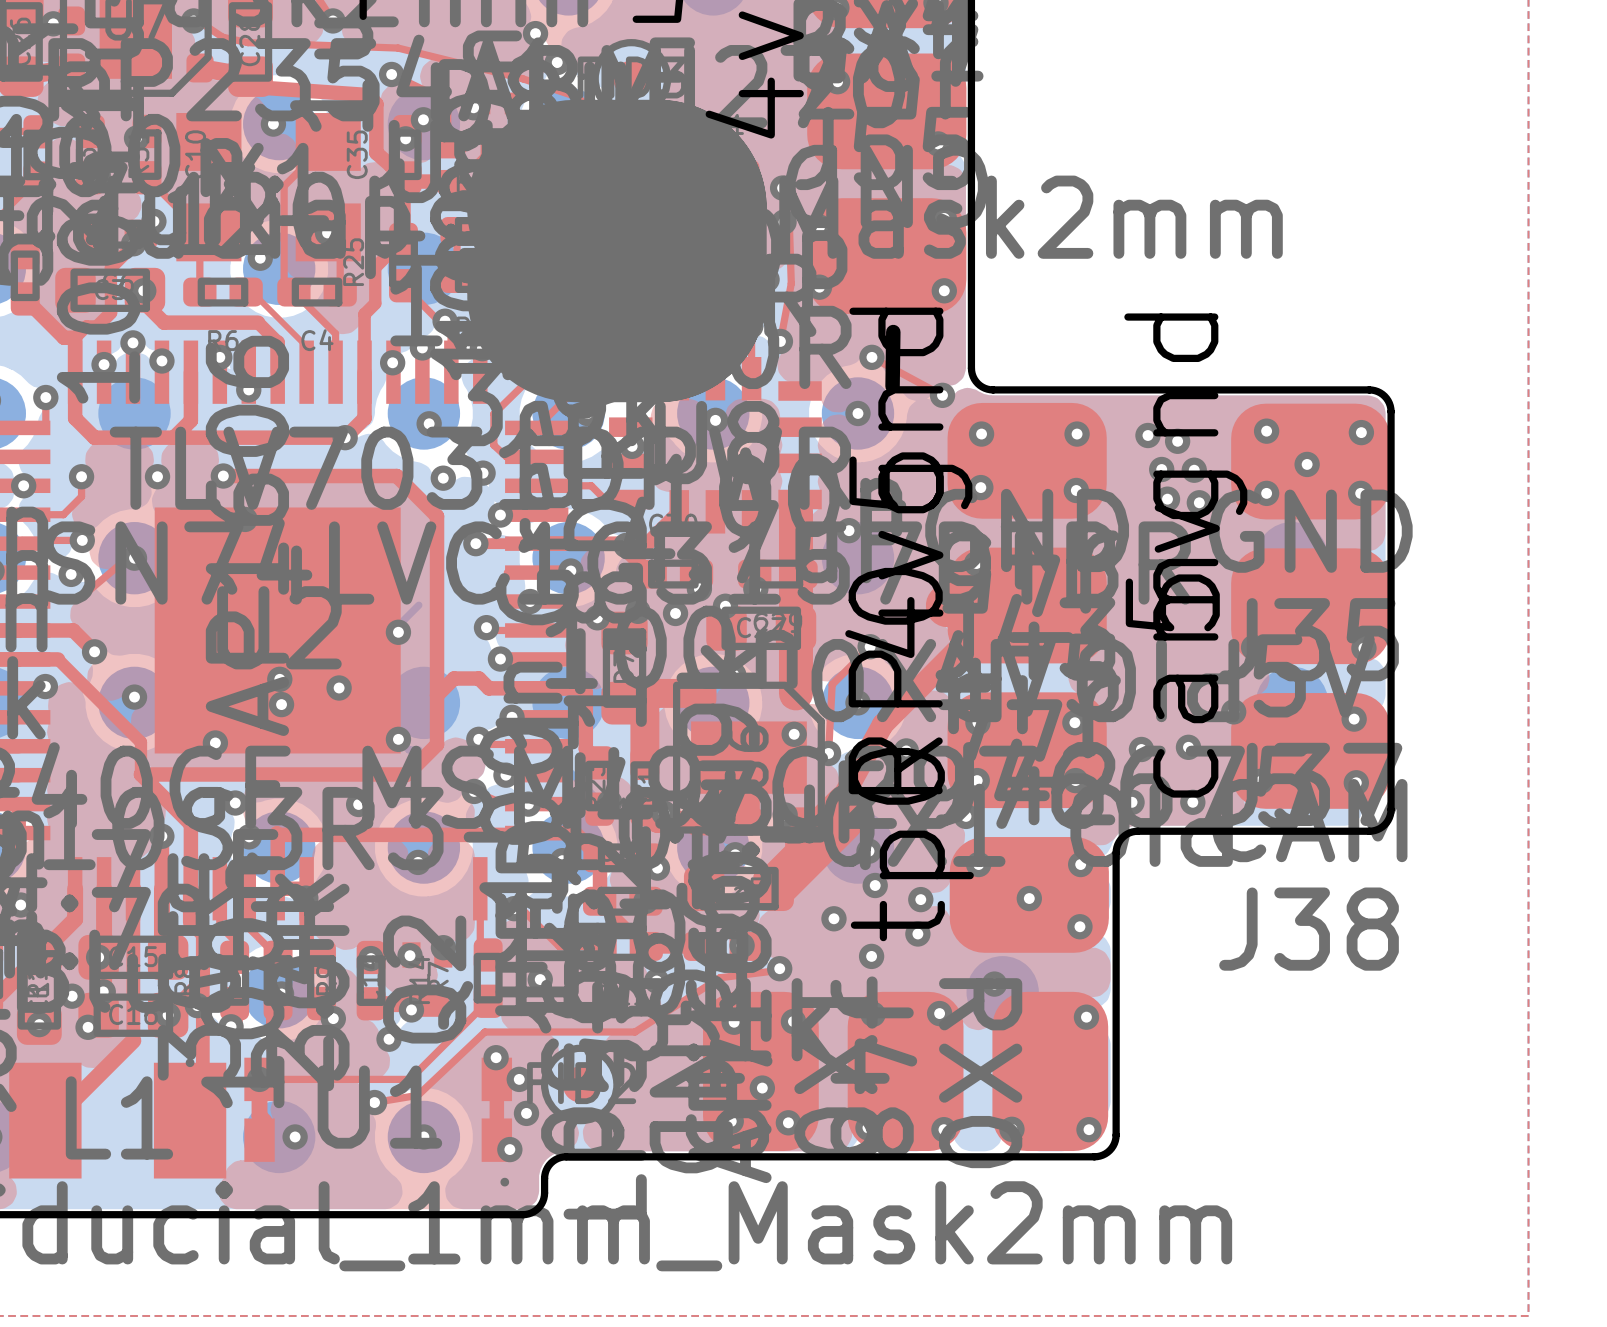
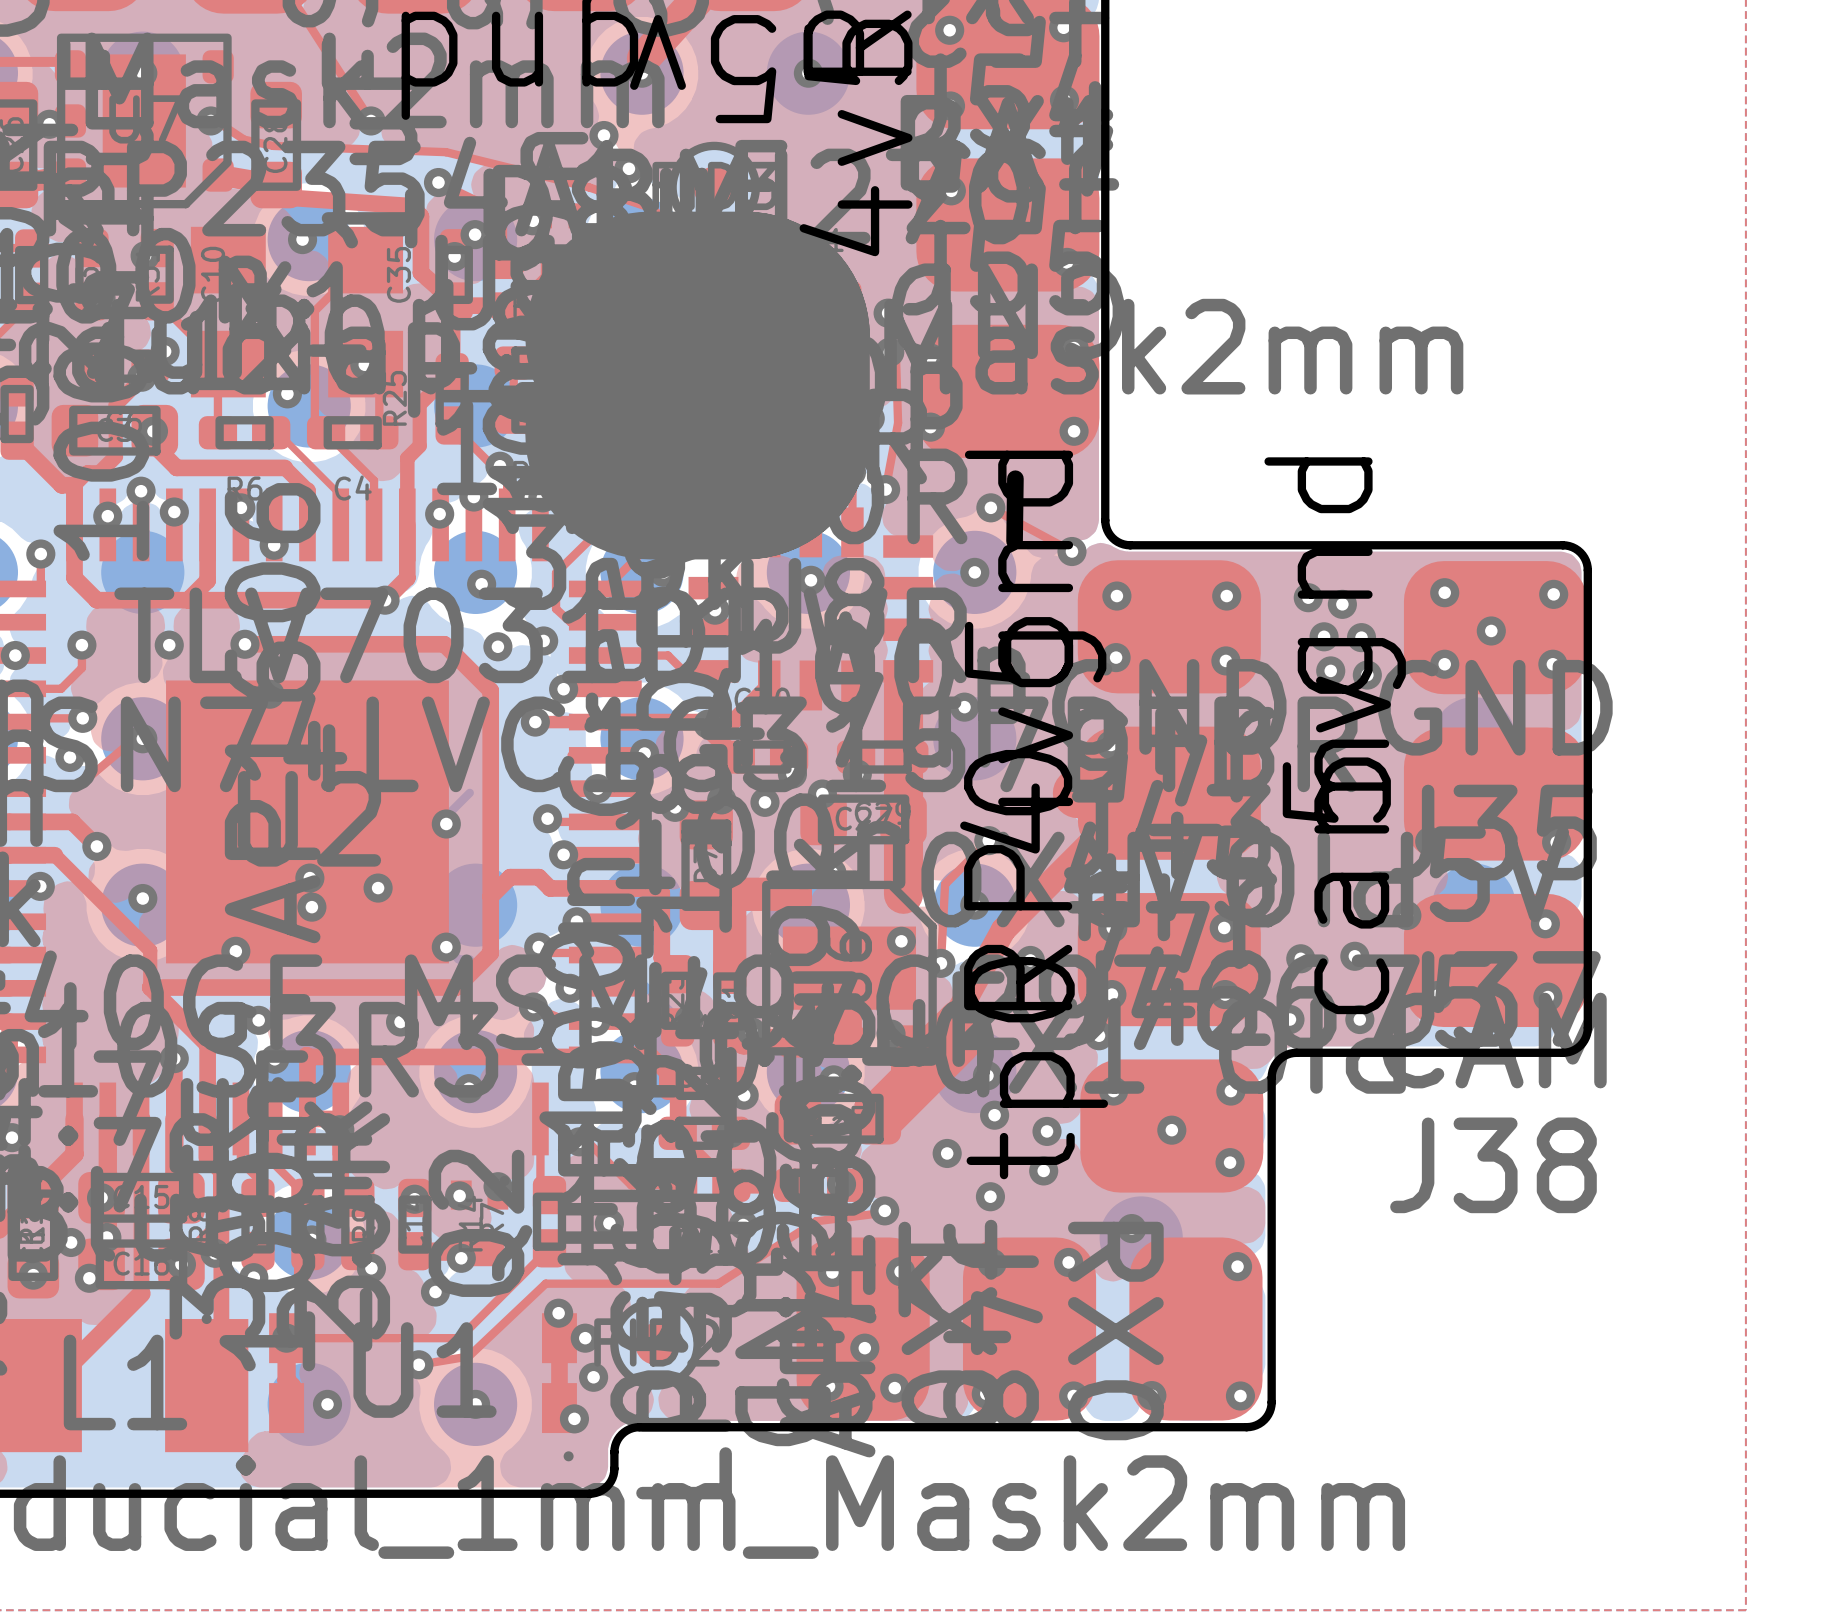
text position: gnd (1185, 416) -> gnd (1335, 575)

